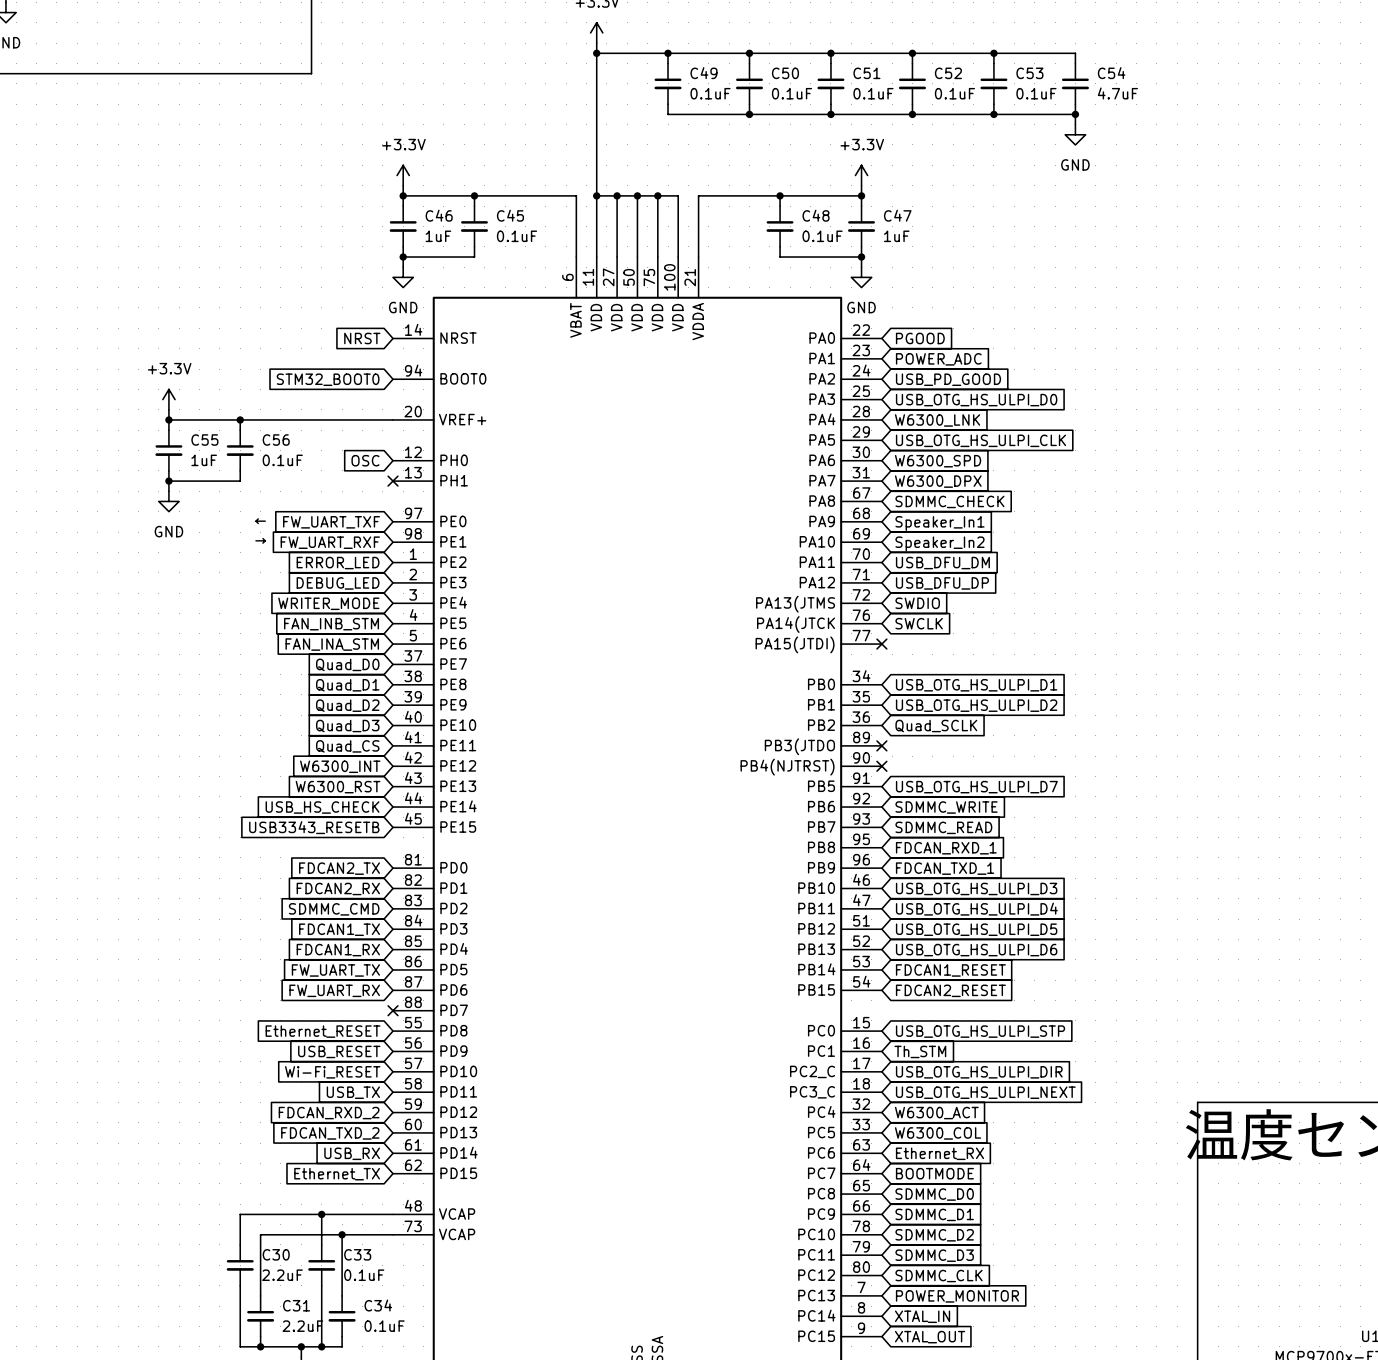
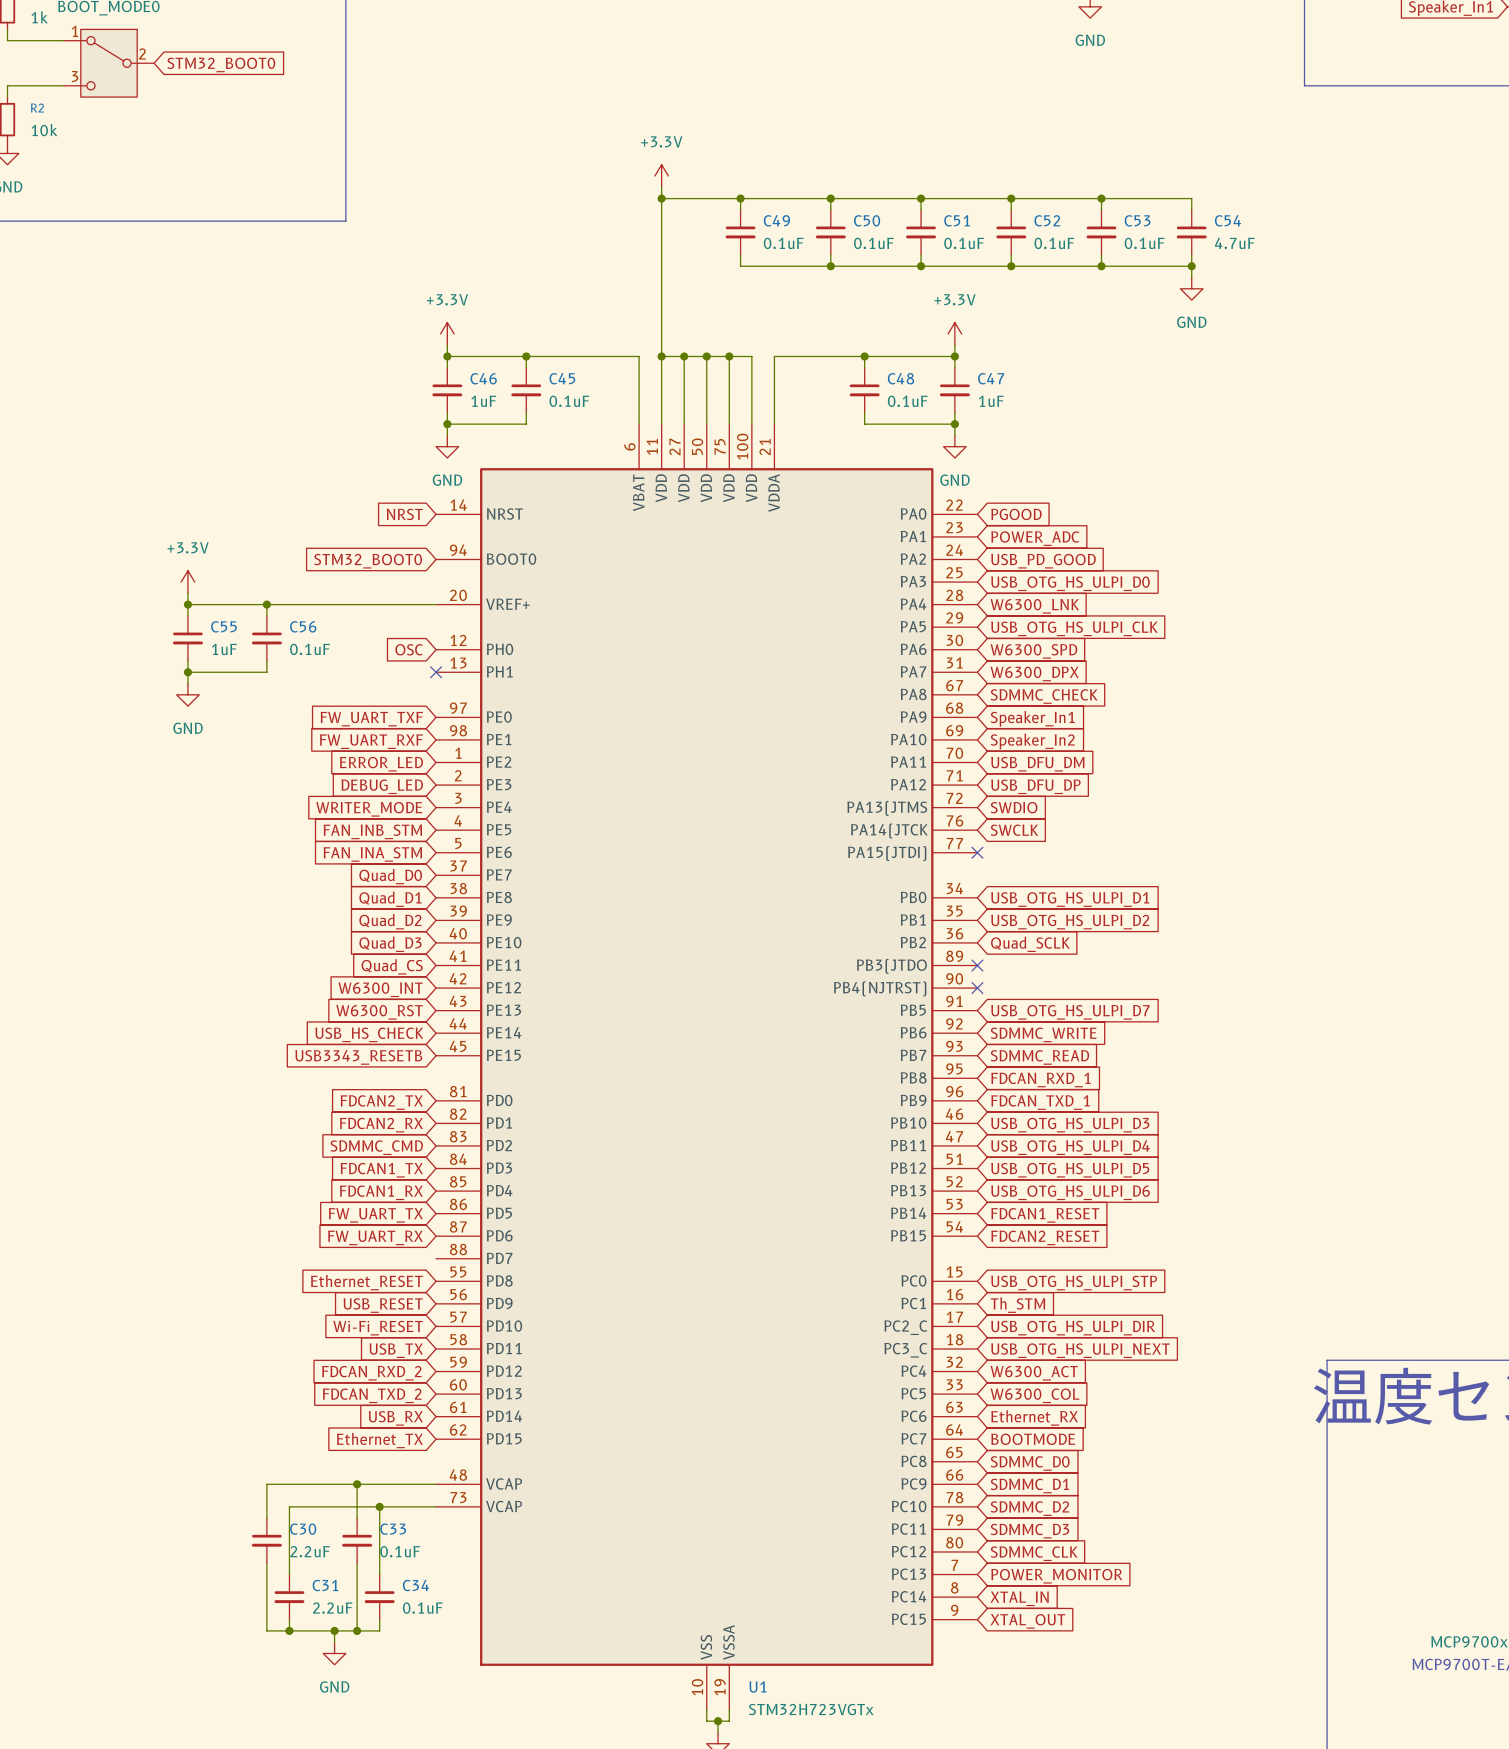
text: ← (260, 521) -> none
text: → (260, 540) -> none
no-connect mark: (393, 1010) -> none

